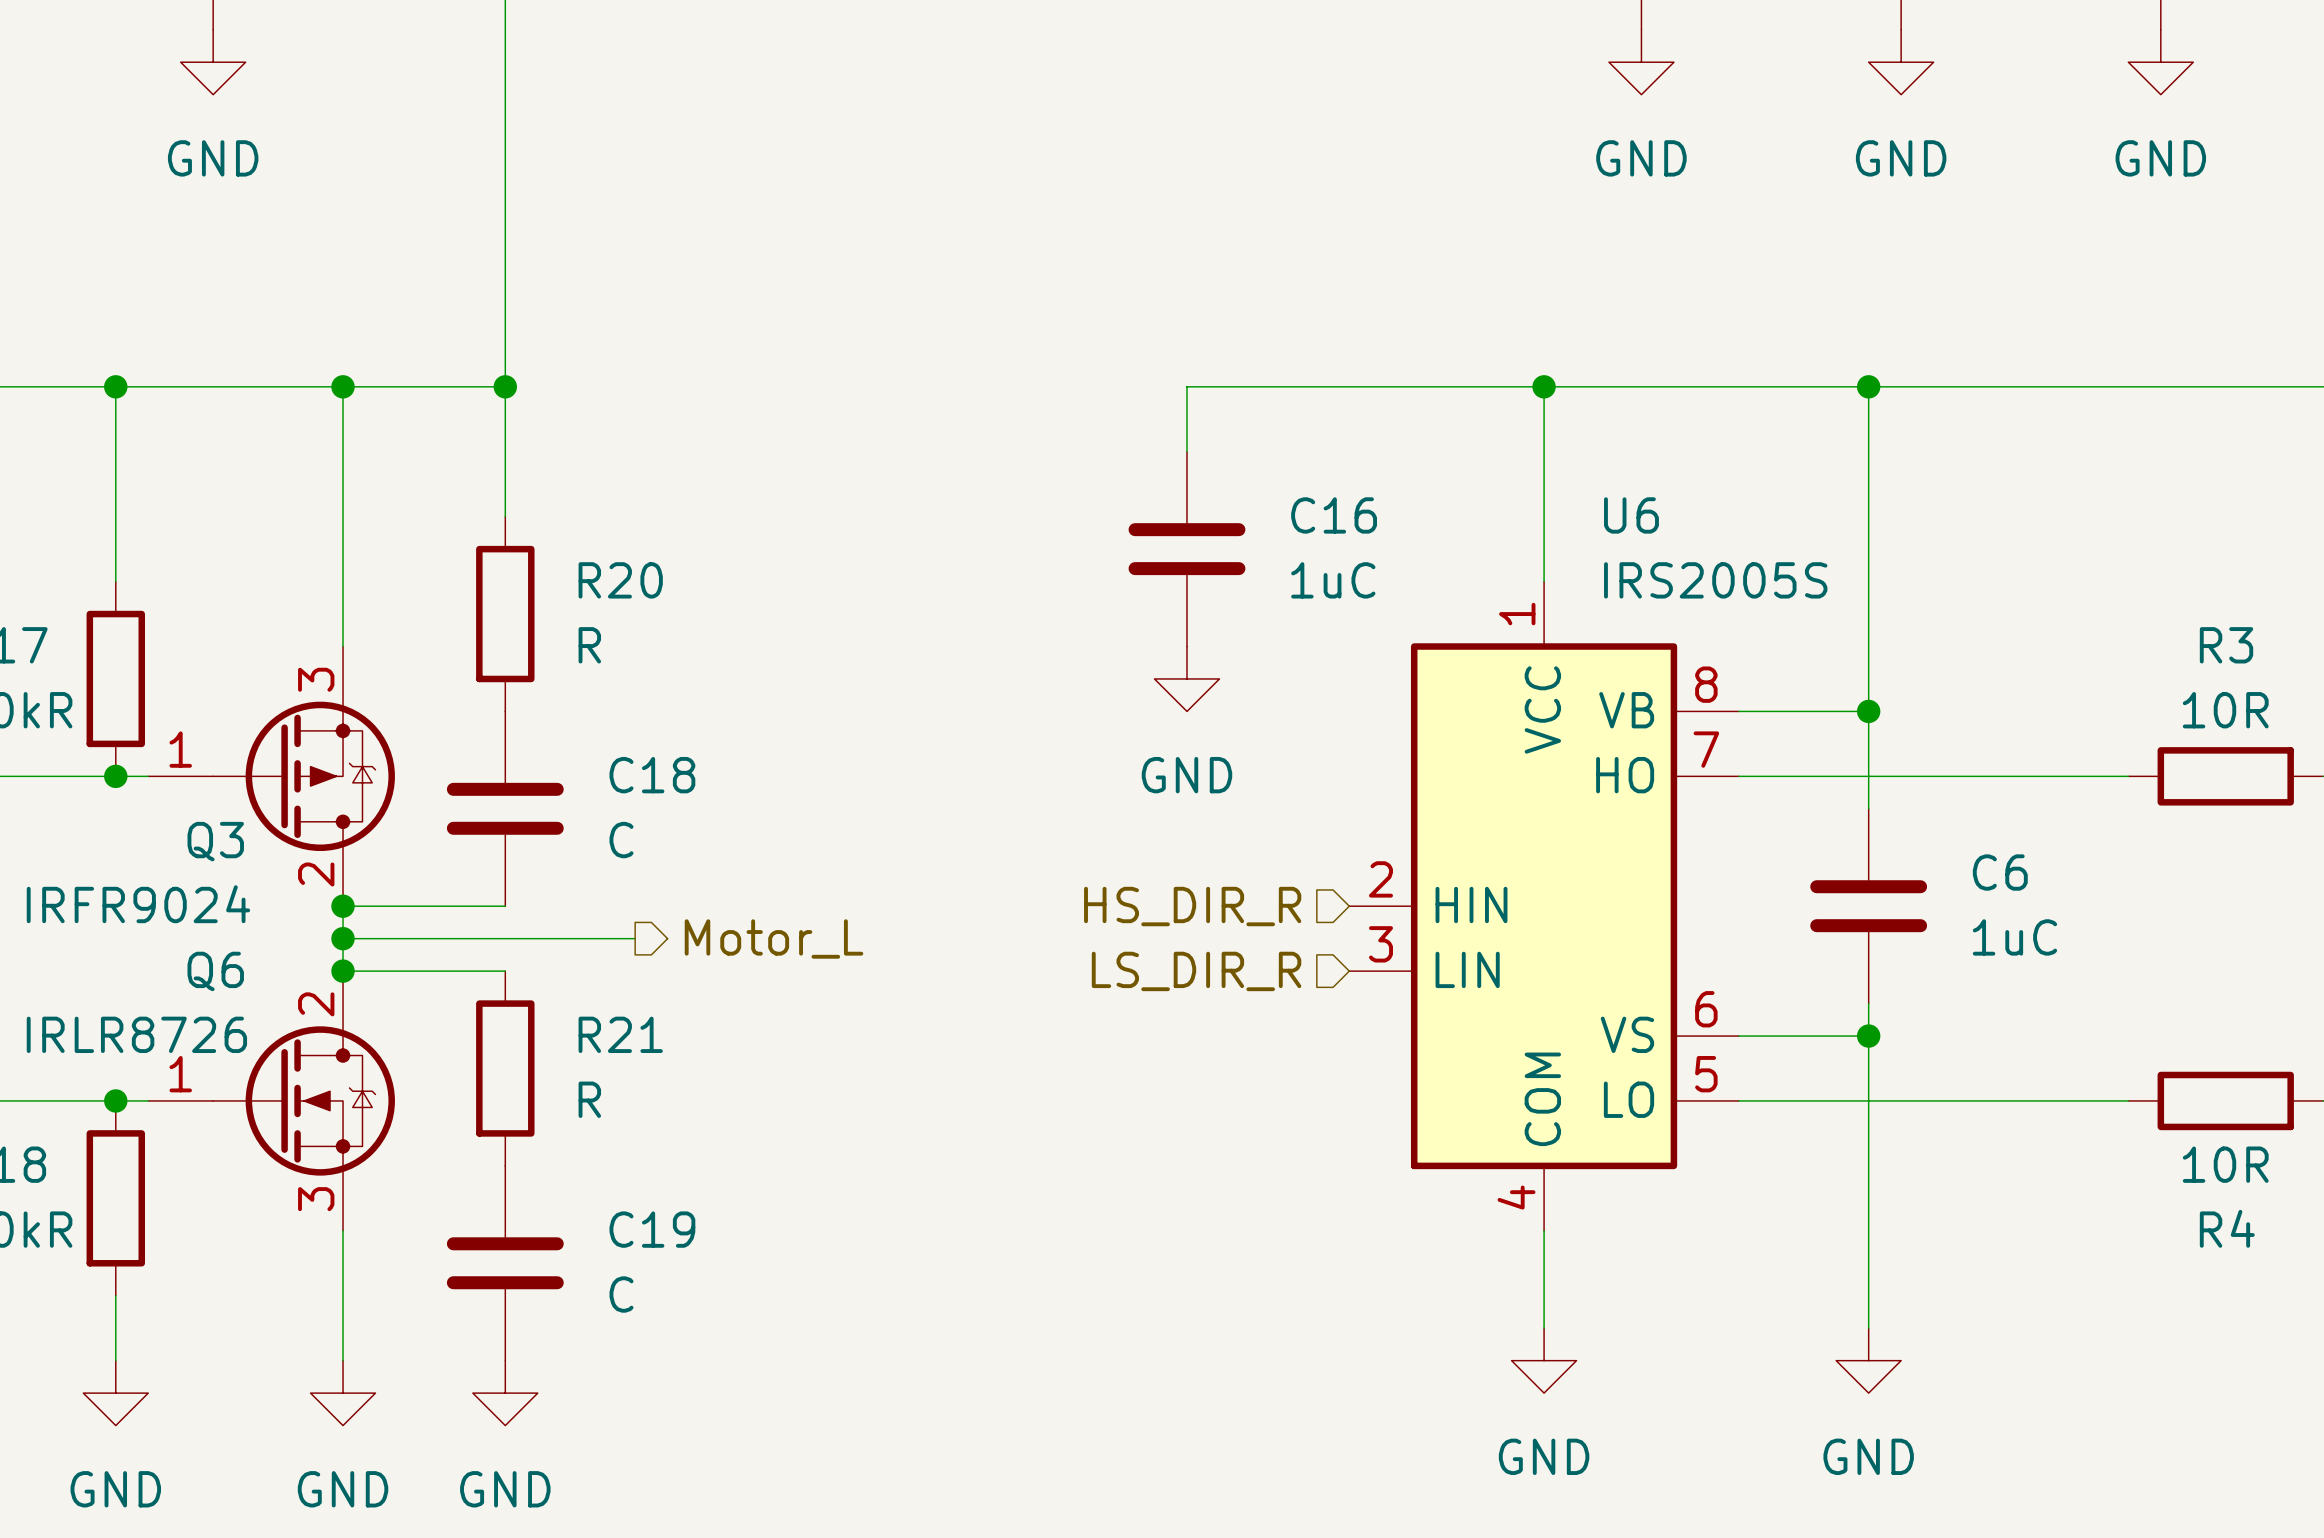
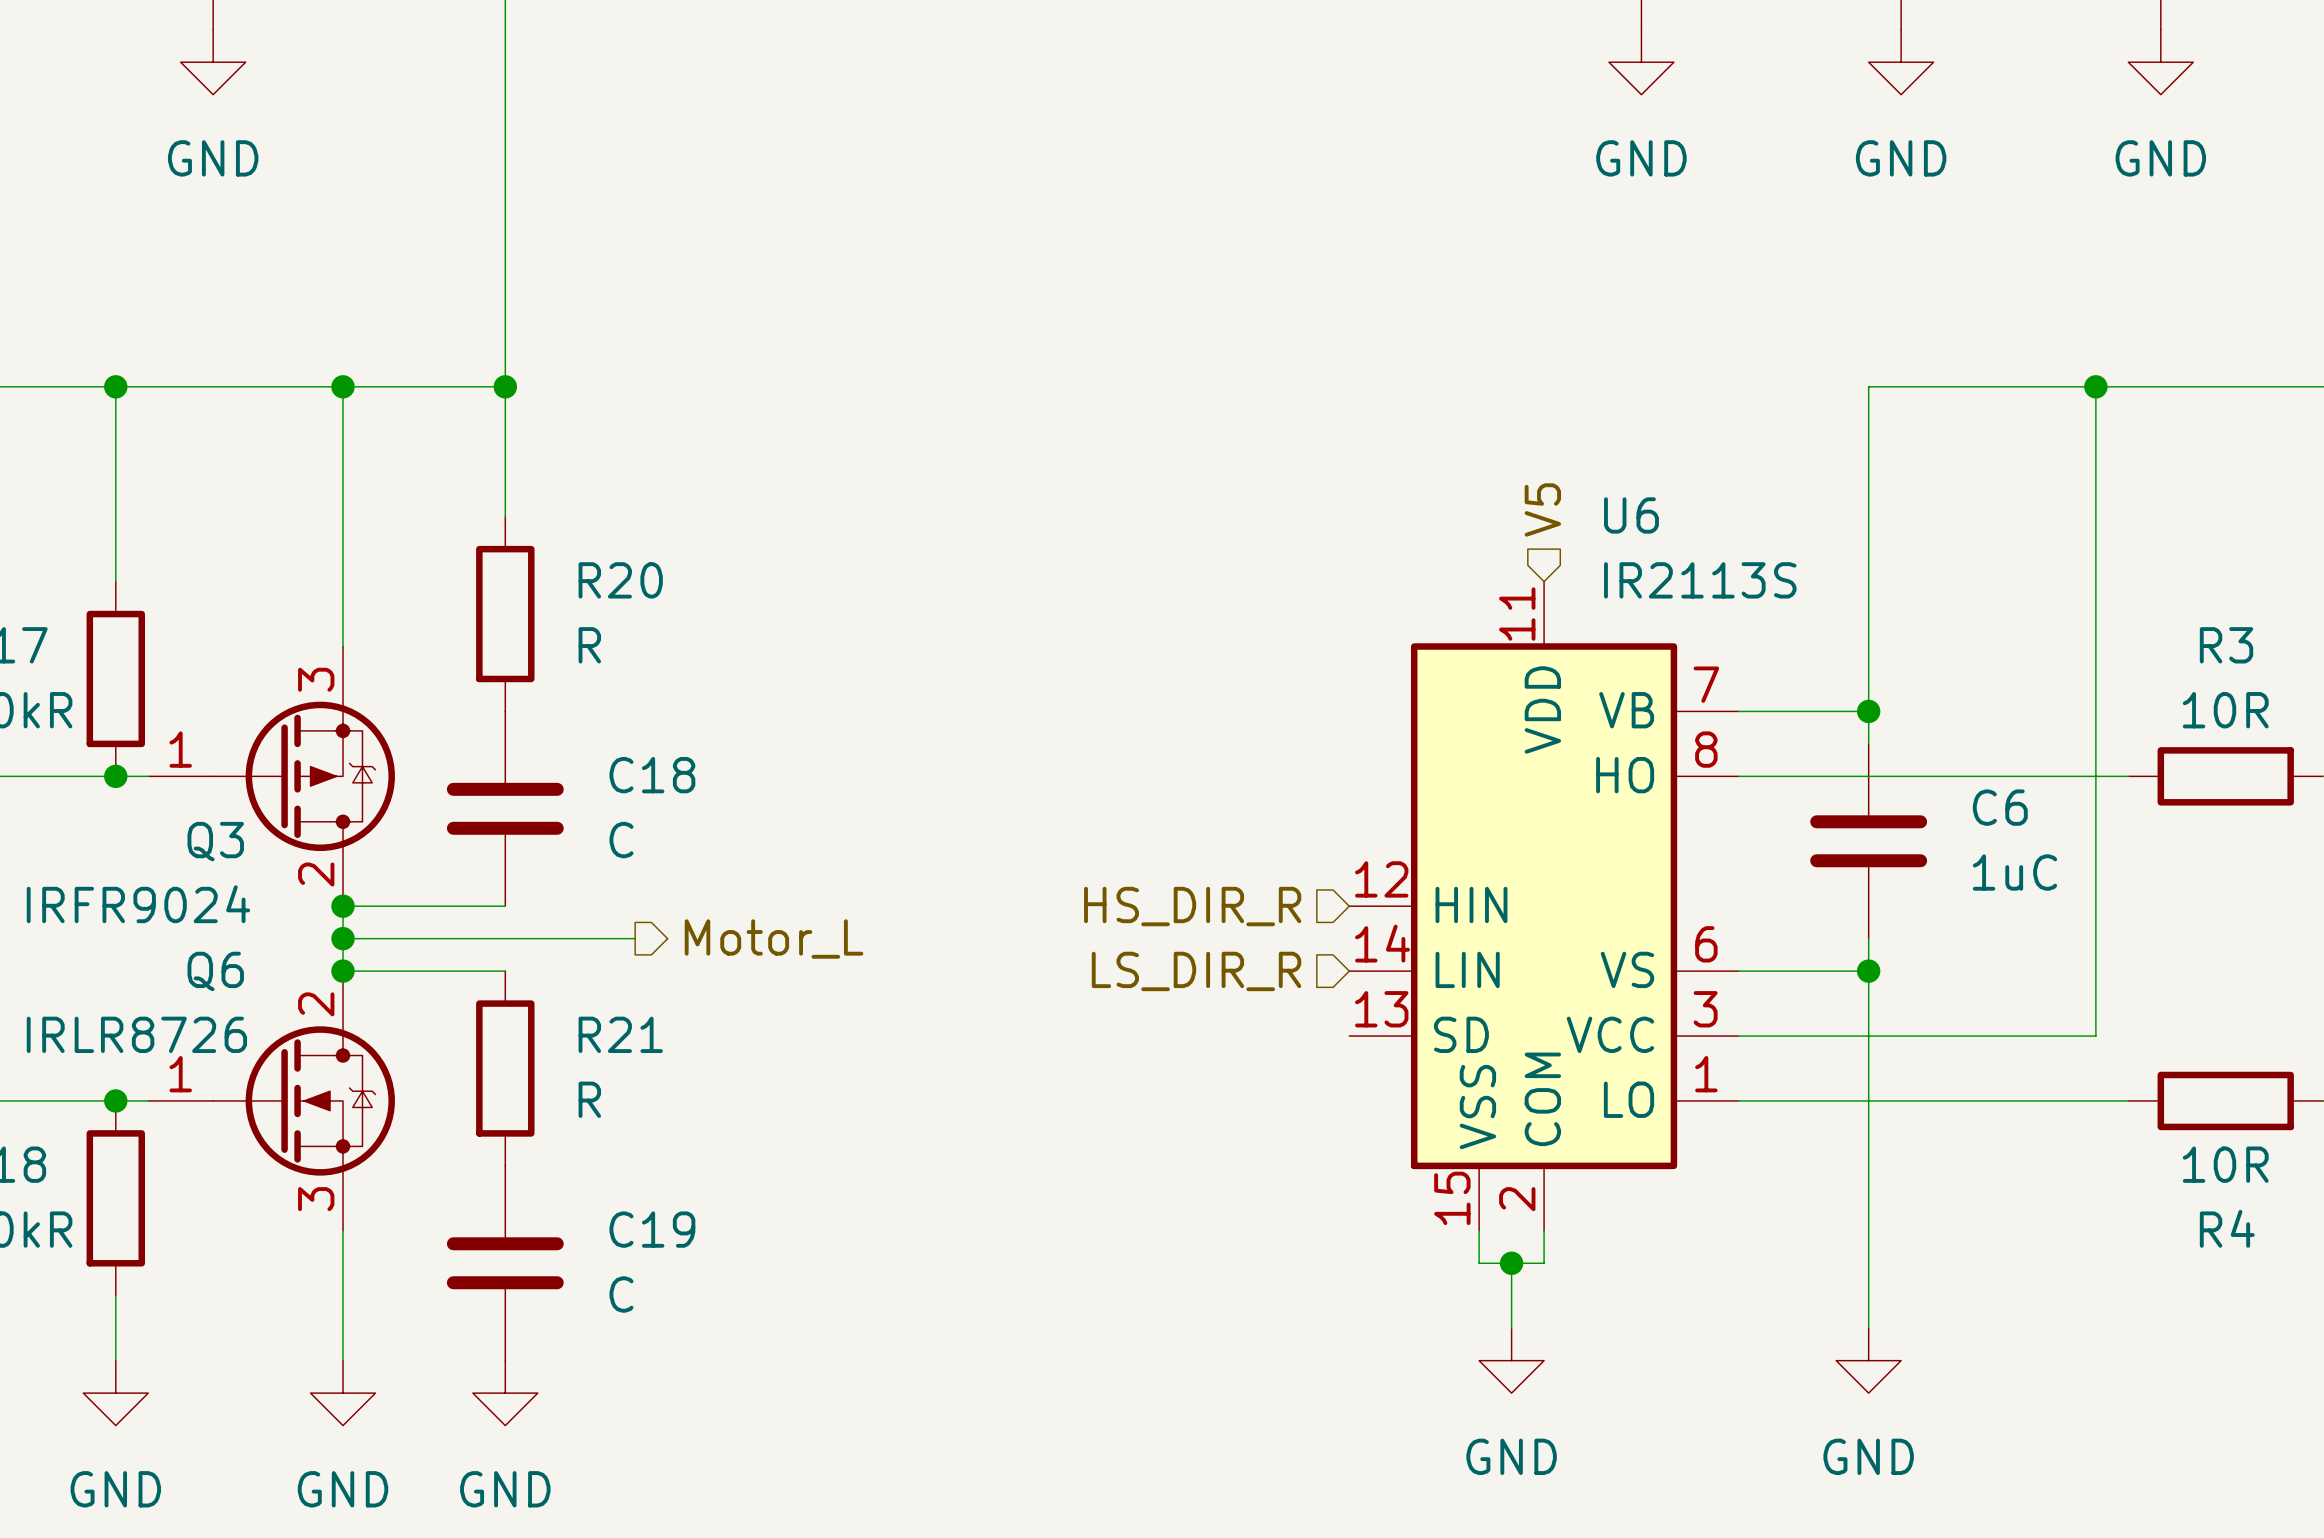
wire: (1544, 386) (1544, 581) -> none
junction: (1544, 386) -> none
wire: (1868, 386) (1186, 386) (1186, 451) -> none
junction: (1868, 386) -> none
wire: none -> (2095, 386) (2095, 1036) (1868, 1036)
junction: none -> (2095, 386)
hierarchical label: none -> V5 (1542, 509)
C16: 1uC (1186, 549) -> none
U6 value: IRS2005S (1715, 580) -> IR2113S (1700, 580)
U6 symbol: [1349, 581, 1739, 1231] -> [1349, 581, 1739, 1231]
power symbol: GND (1186, 678) -> none
C6 position: (1868, 906) -> (1868, 841)
wire: none -> (1738, 971) (1868, 971)
junction position: (1868, 1036) -> (1868, 971)
wire: none -> (1511, 1263) (1511, 1328)
junction: none -> (1511, 1263)
wire: (1544, 1263) (1544, 1328) -> (1544, 1263) (1479, 1263) (1479, 1230)
power symbol position: GND (1544, 1360) -> GND (1511, 1360)

